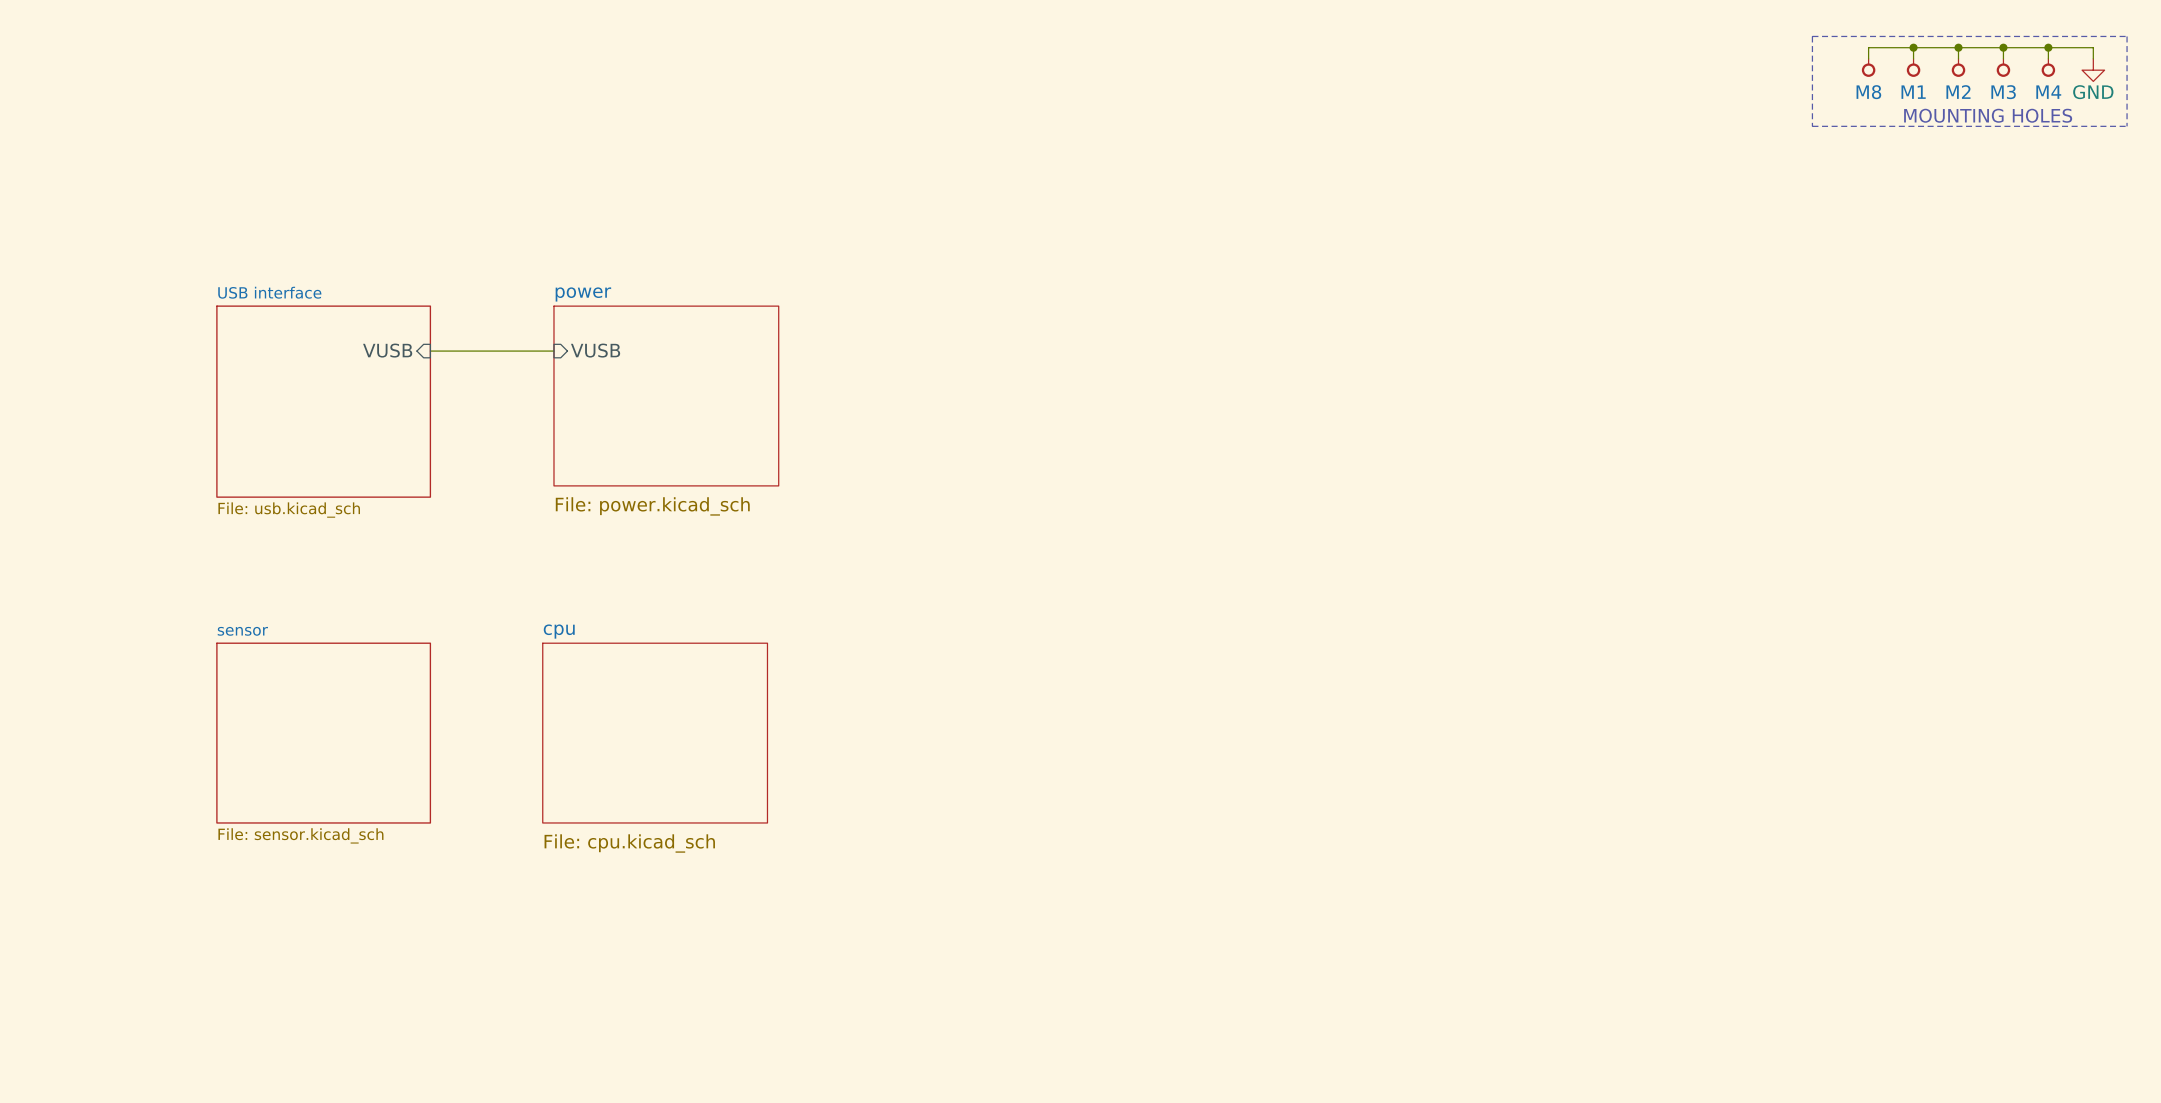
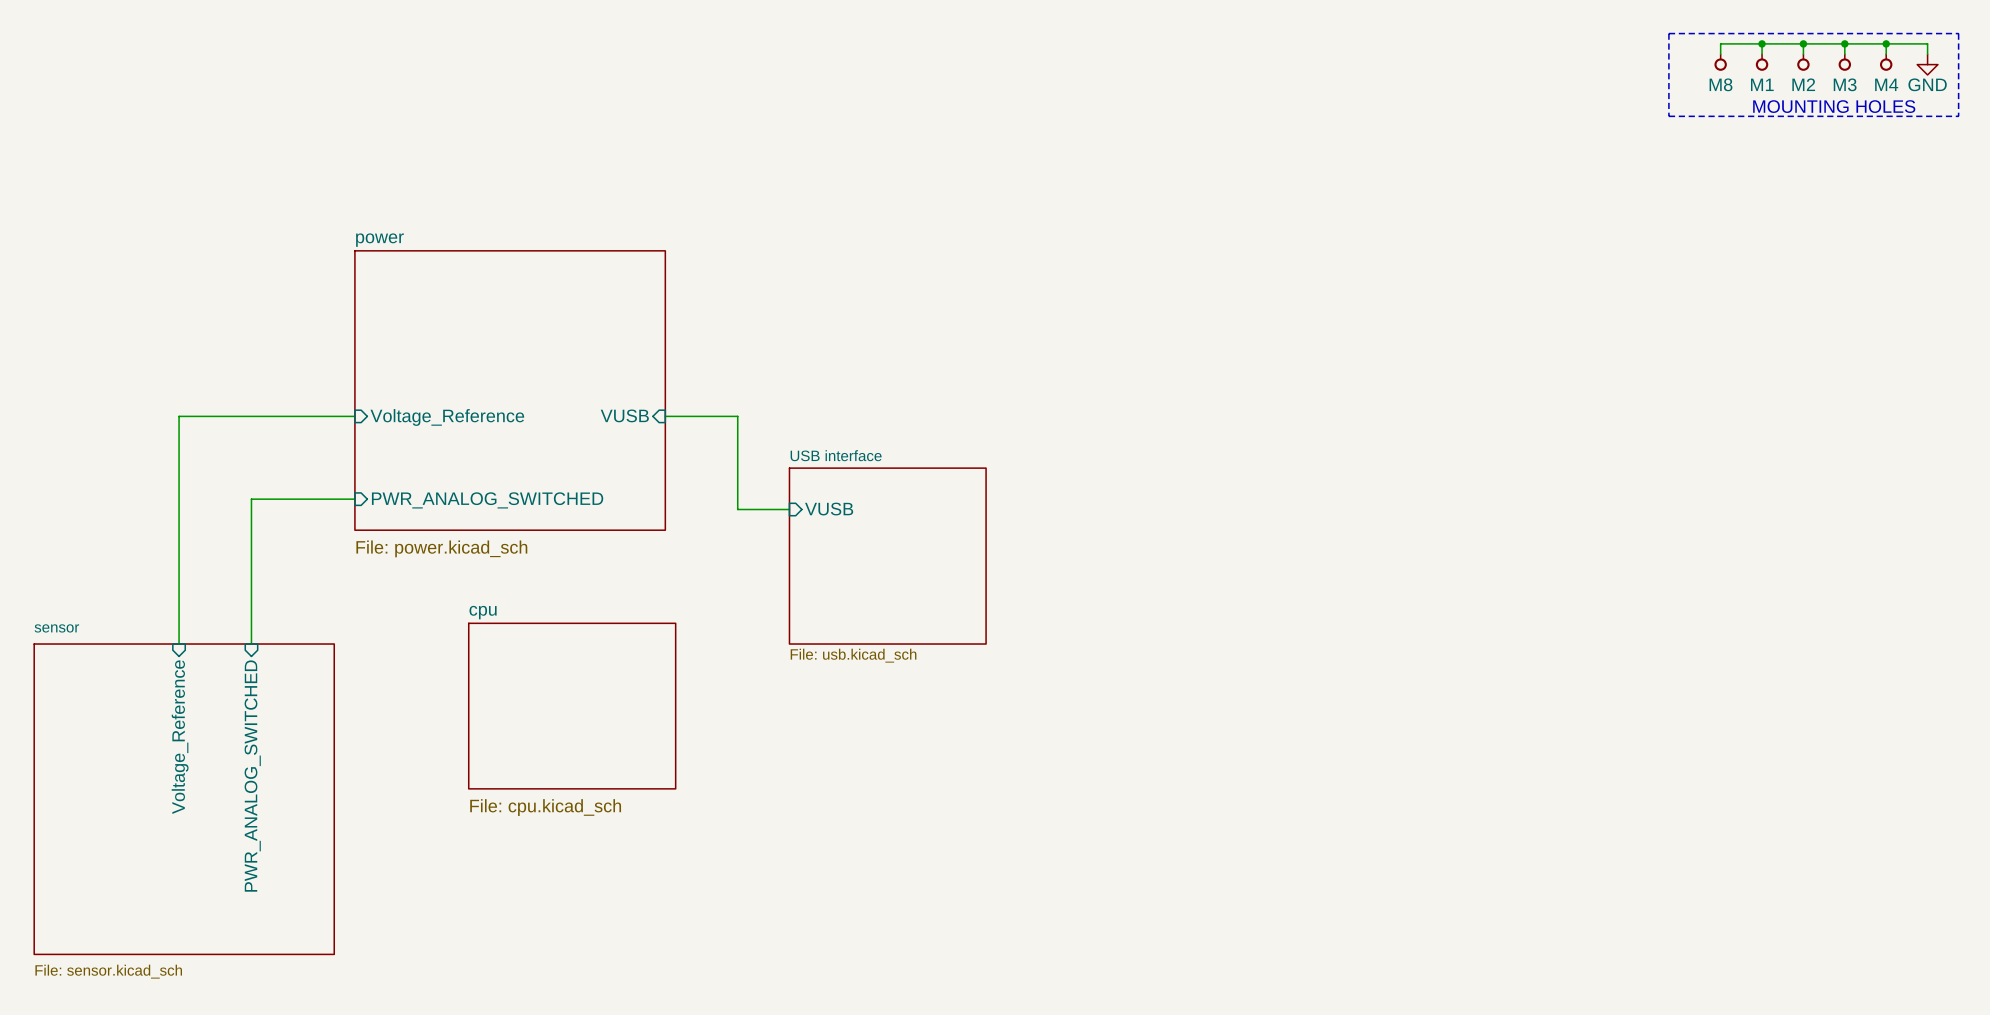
sheet pin: VUSB (387, 350) -> none
sheet pin: VUSB (595, 350) -> none
wire: (430, 351) (553, 351) -> none
sheet power: File: power.kicad_sch (666, 396) -> none
sheet USB interface: File: usb.kicad_sch (323, 401) -> none
sheet power: none -> File: power.kicad_sch (510, 390)
sheet pin: none -> VUSB (624, 415)
wire: none -> (354, 416) (179, 416) (179, 644)
wire: none -> (665, 416) (737, 416) (737, 509) (789, 509)
sheet pin: none -> Voltage_Reference (447, 417)
wire: none -> (354, 499) (251, 499) (251, 644)
sheet pin: none -> PWR_ANALOG_SWITCHED (487, 500)
sheet pin: none -> VUSB (829, 509)
sheet USB interface: none -> File: usb.kicad_sch (887, 556)
sheet sensor: File: sensor.kicad_sch (323, 733) -> none
sheet cpu position: (655, 733) -> (572, 706)
sheet pin: none -> Voltage_Reference (180, 737)
sheet pin: none -> PWR_ANALOG_SWITCHED (252, 776)
sheet sensor: none -> File: sensor.kicad_sch (184, 799)

